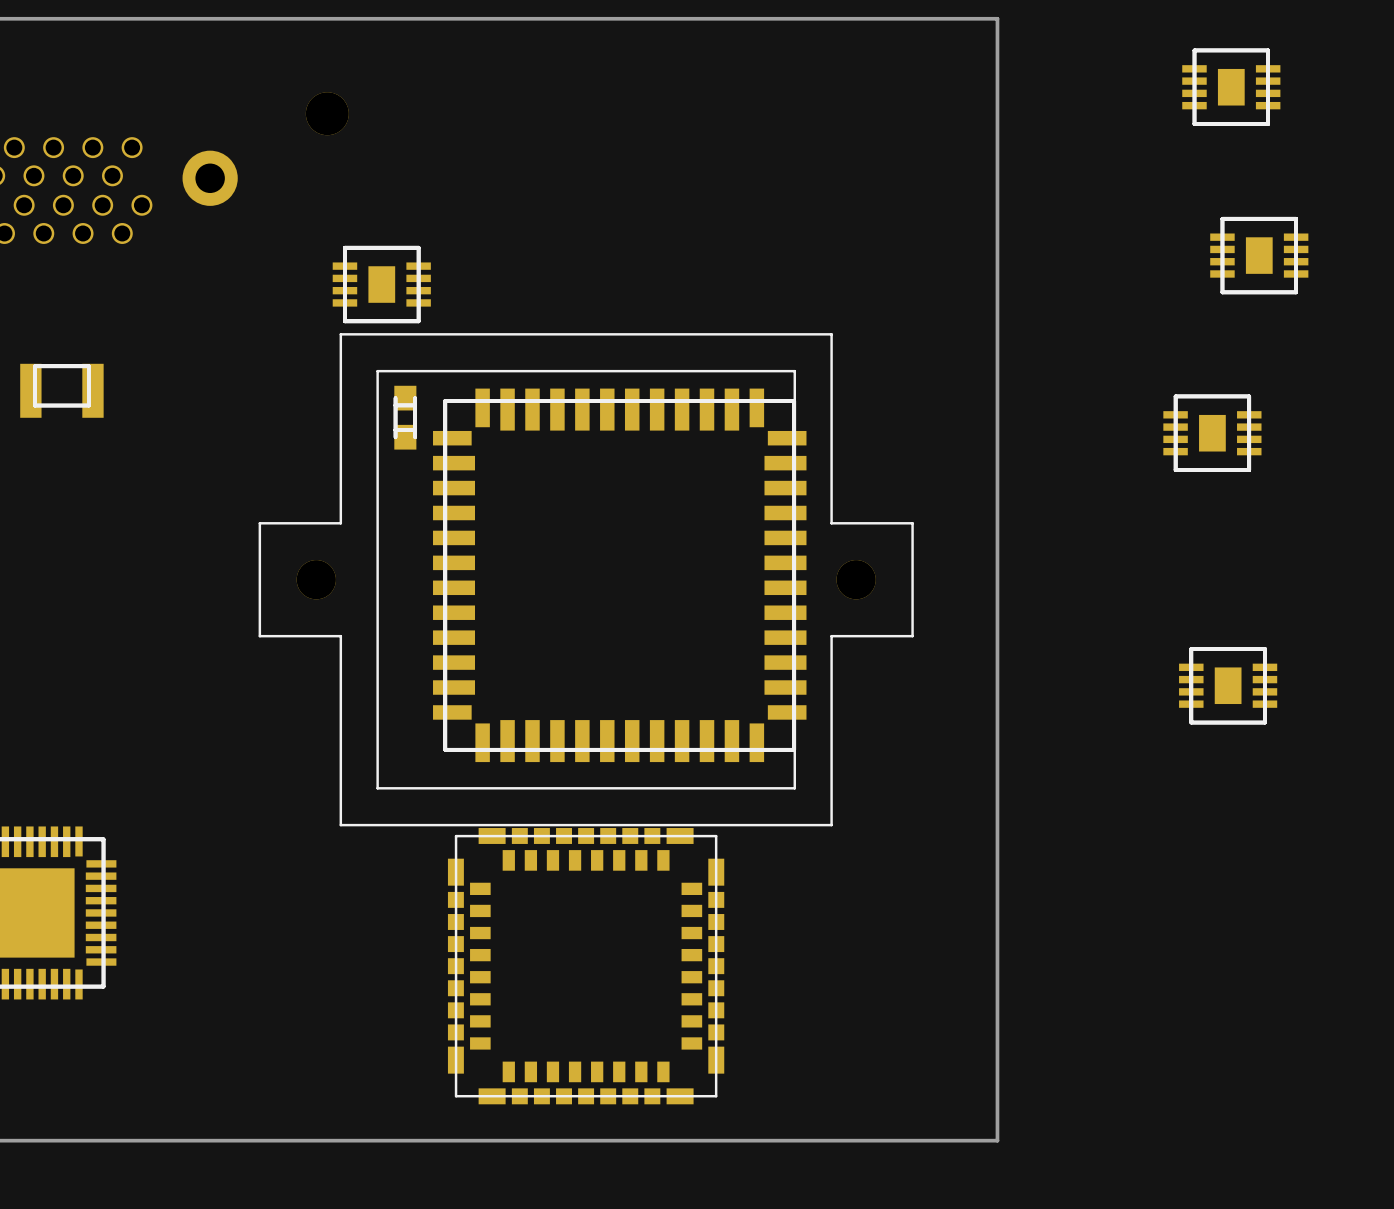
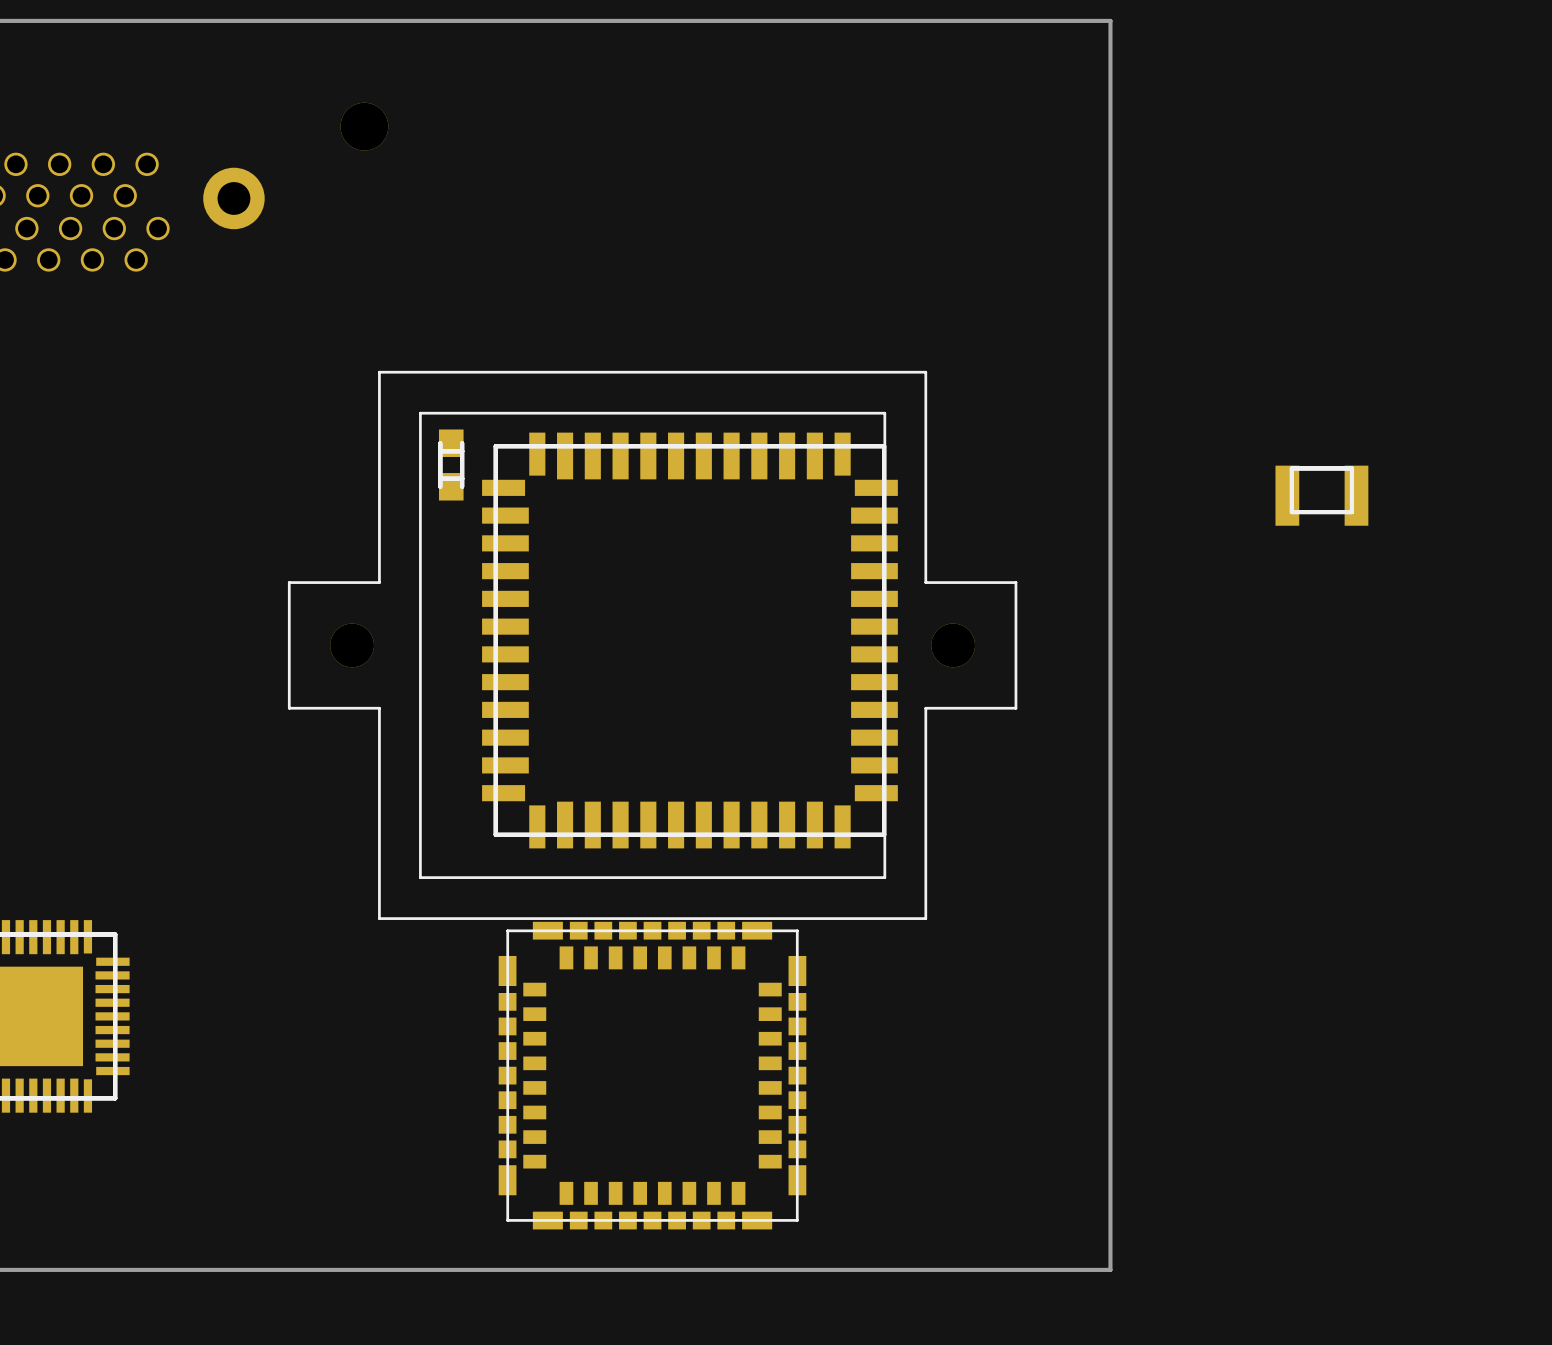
part: (1231, 87) -> none
part: (1259, 255) -> none
part: (381, 284) -> none
part: (61, 390) -> none
part: (1212, 433) -> none
part: none -> (1321, 495)
part: (1228, 685) -> none

